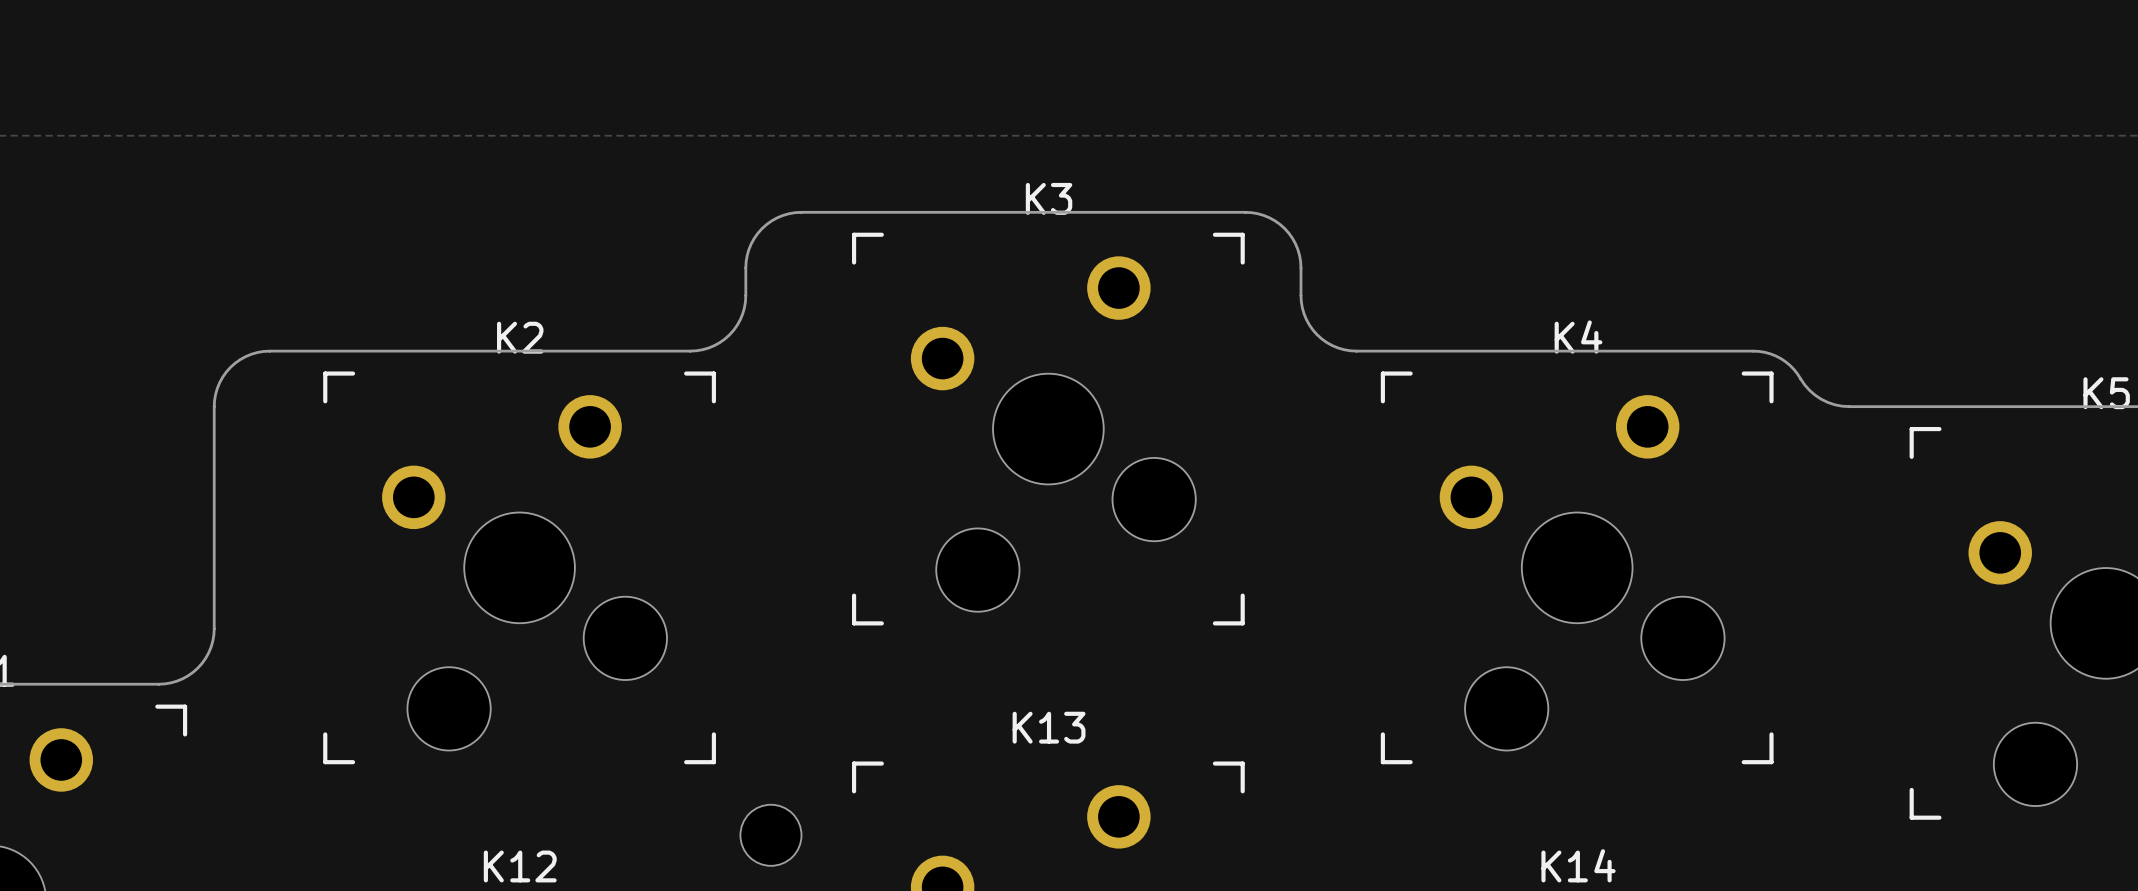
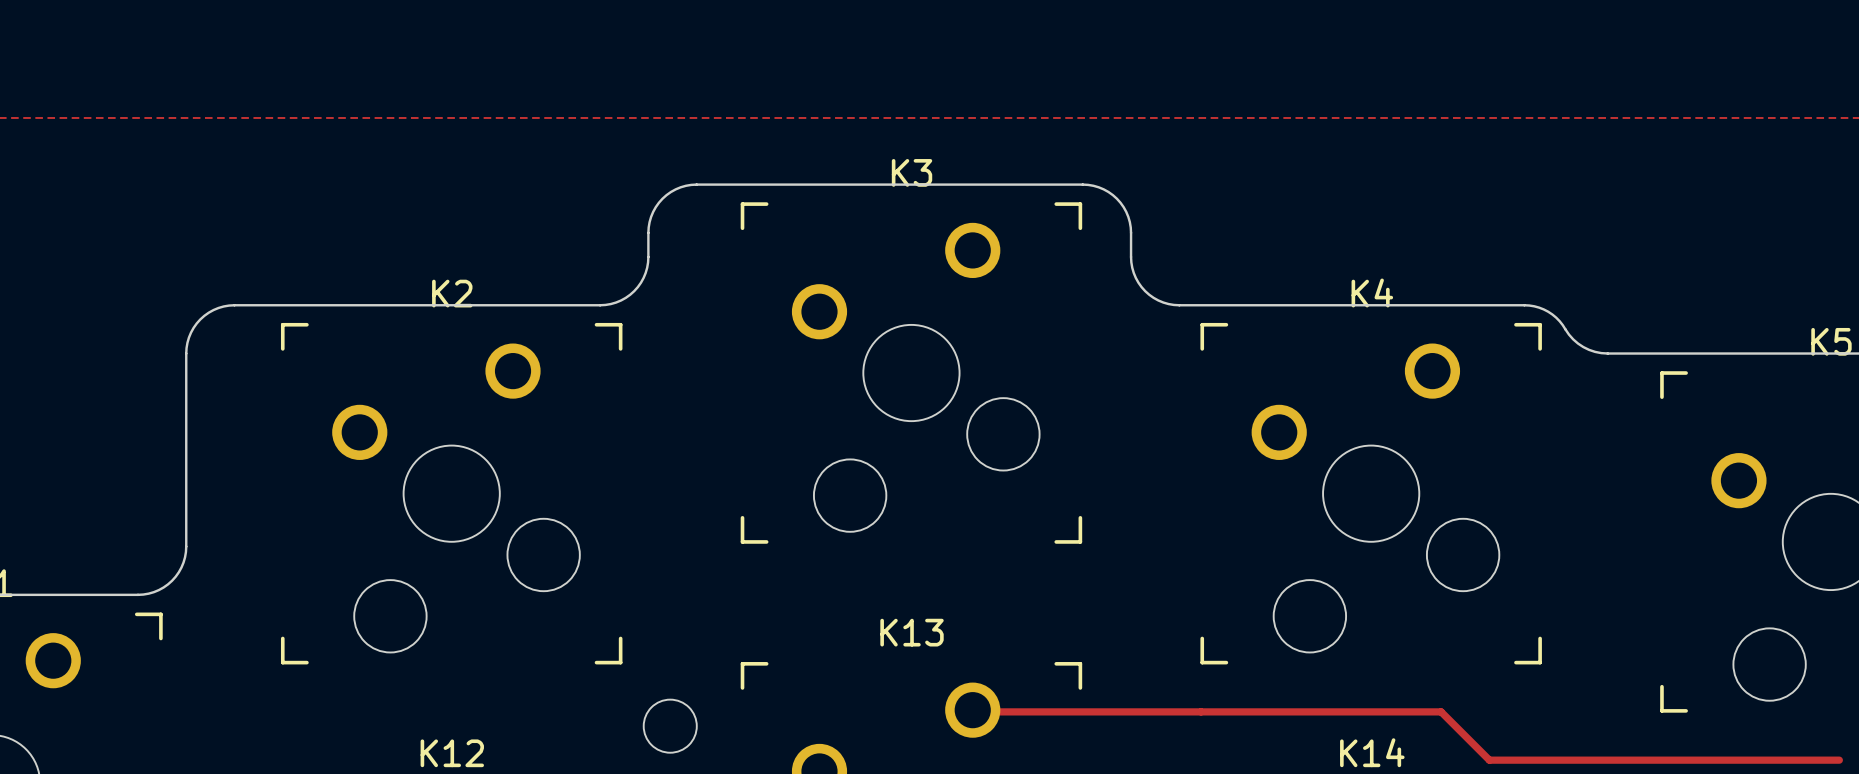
track: none -> (972, 710) (974, 711) (1441, 711) (1489, 760) (1839, 760)

